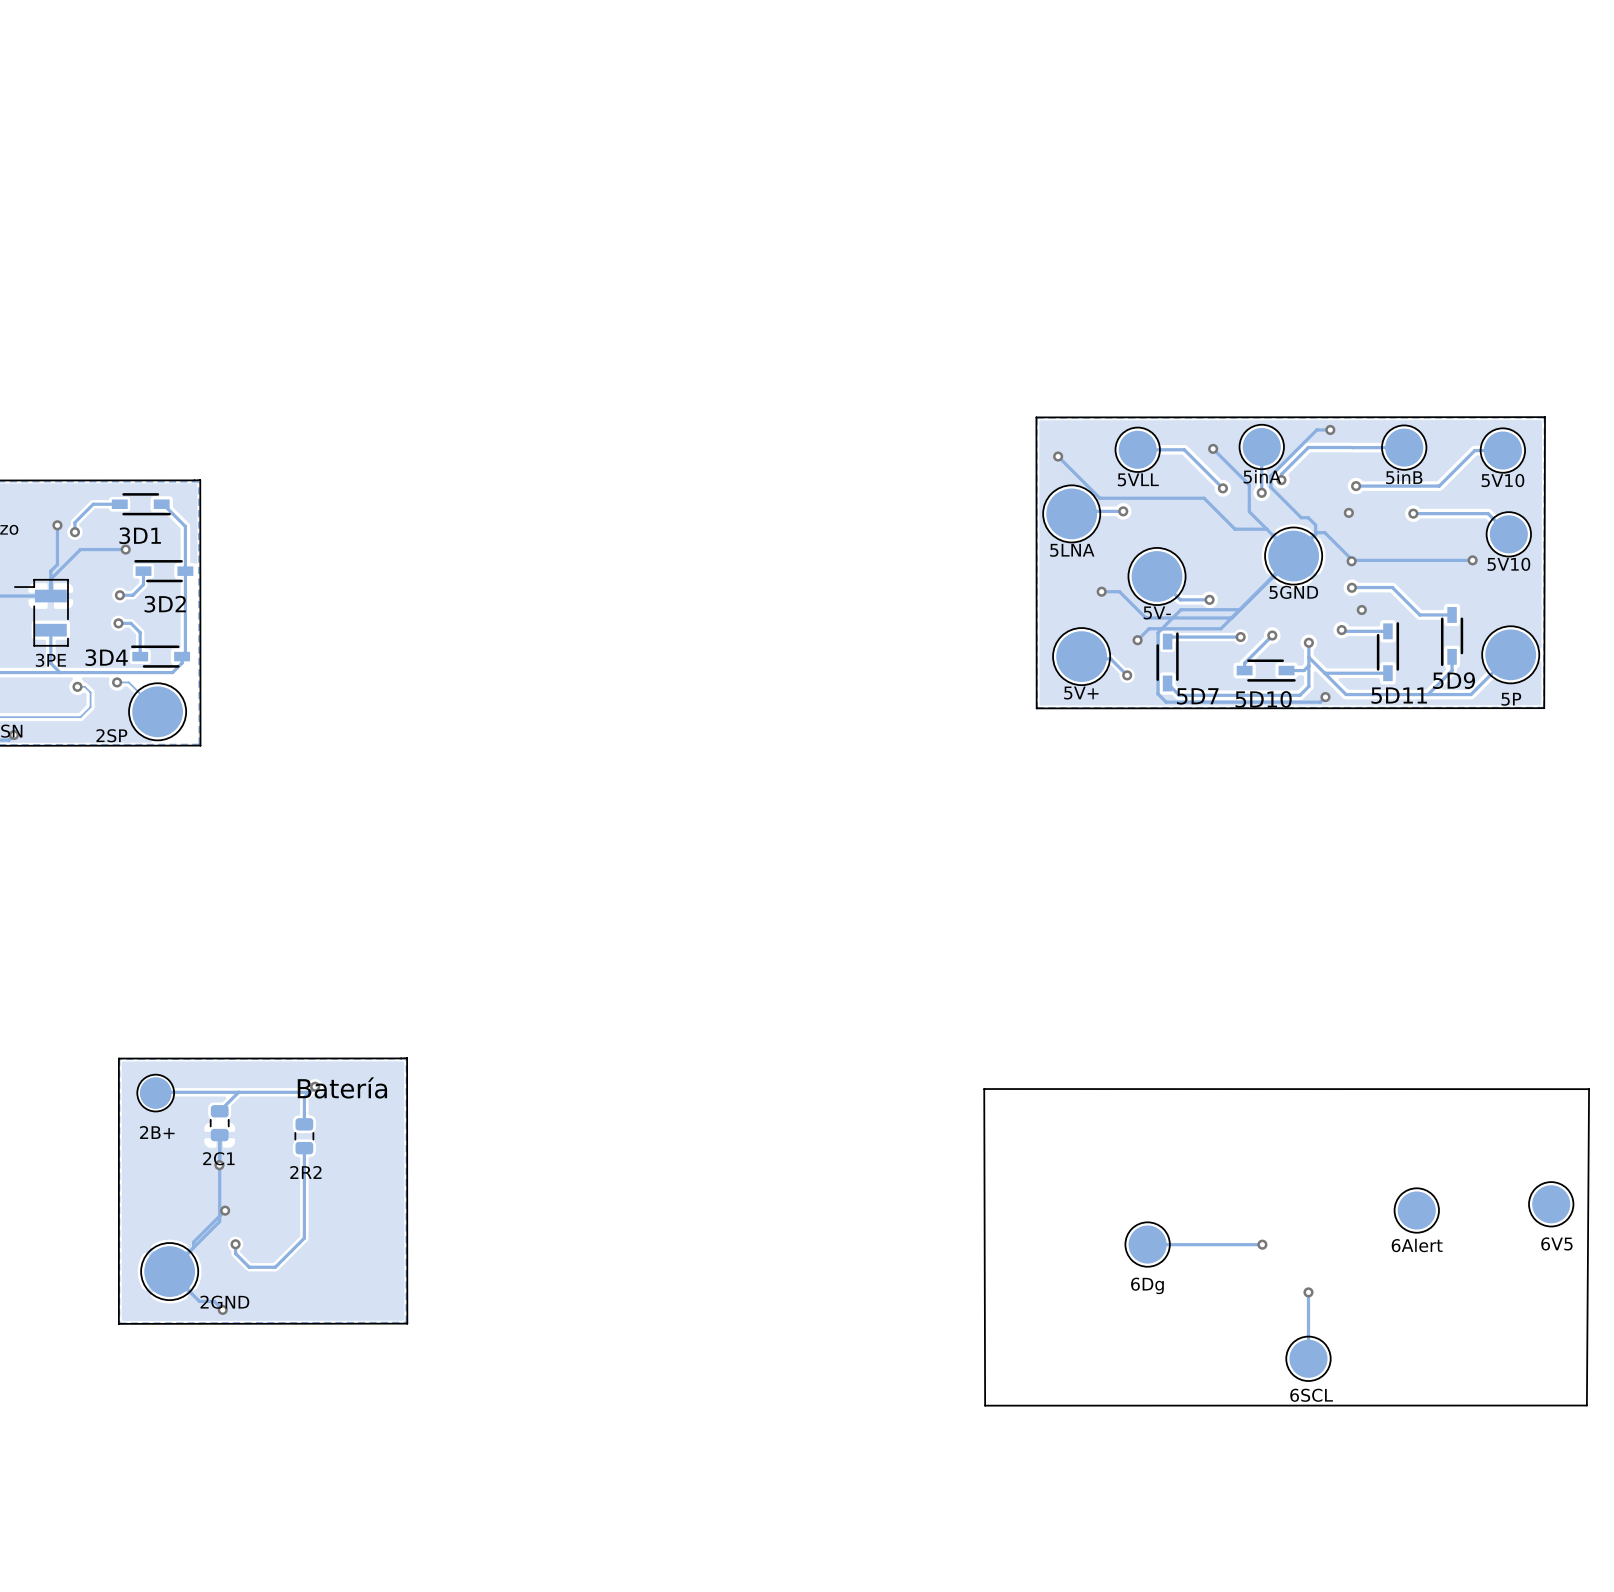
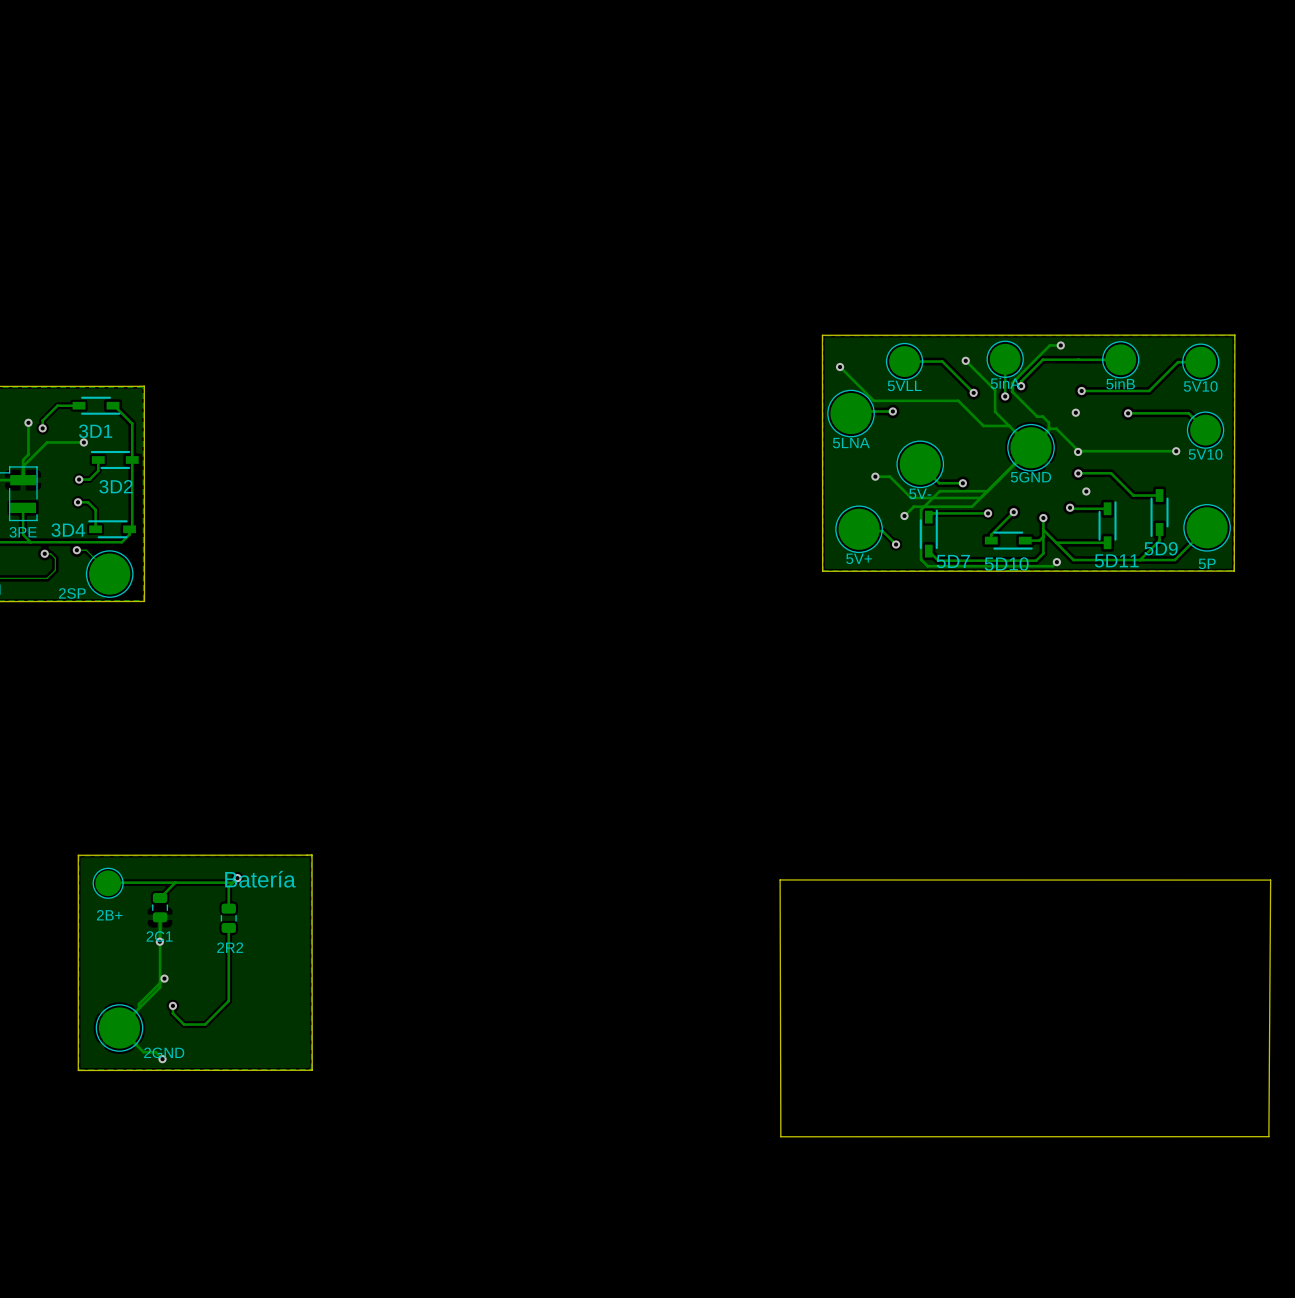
6V5: (1551, 1204) -> none
6Alert: (1416, 1210) -> none
6Dg: (1147, 1244) -> none
track: (1262, 1244) (1147, 1244) -> none
via: (1262, 1244) -> none
track: (1308, 1292) (1308, 1358) -> none
via: (1308, 1292) -> none
6SCL: (1308, 1358) -> none

